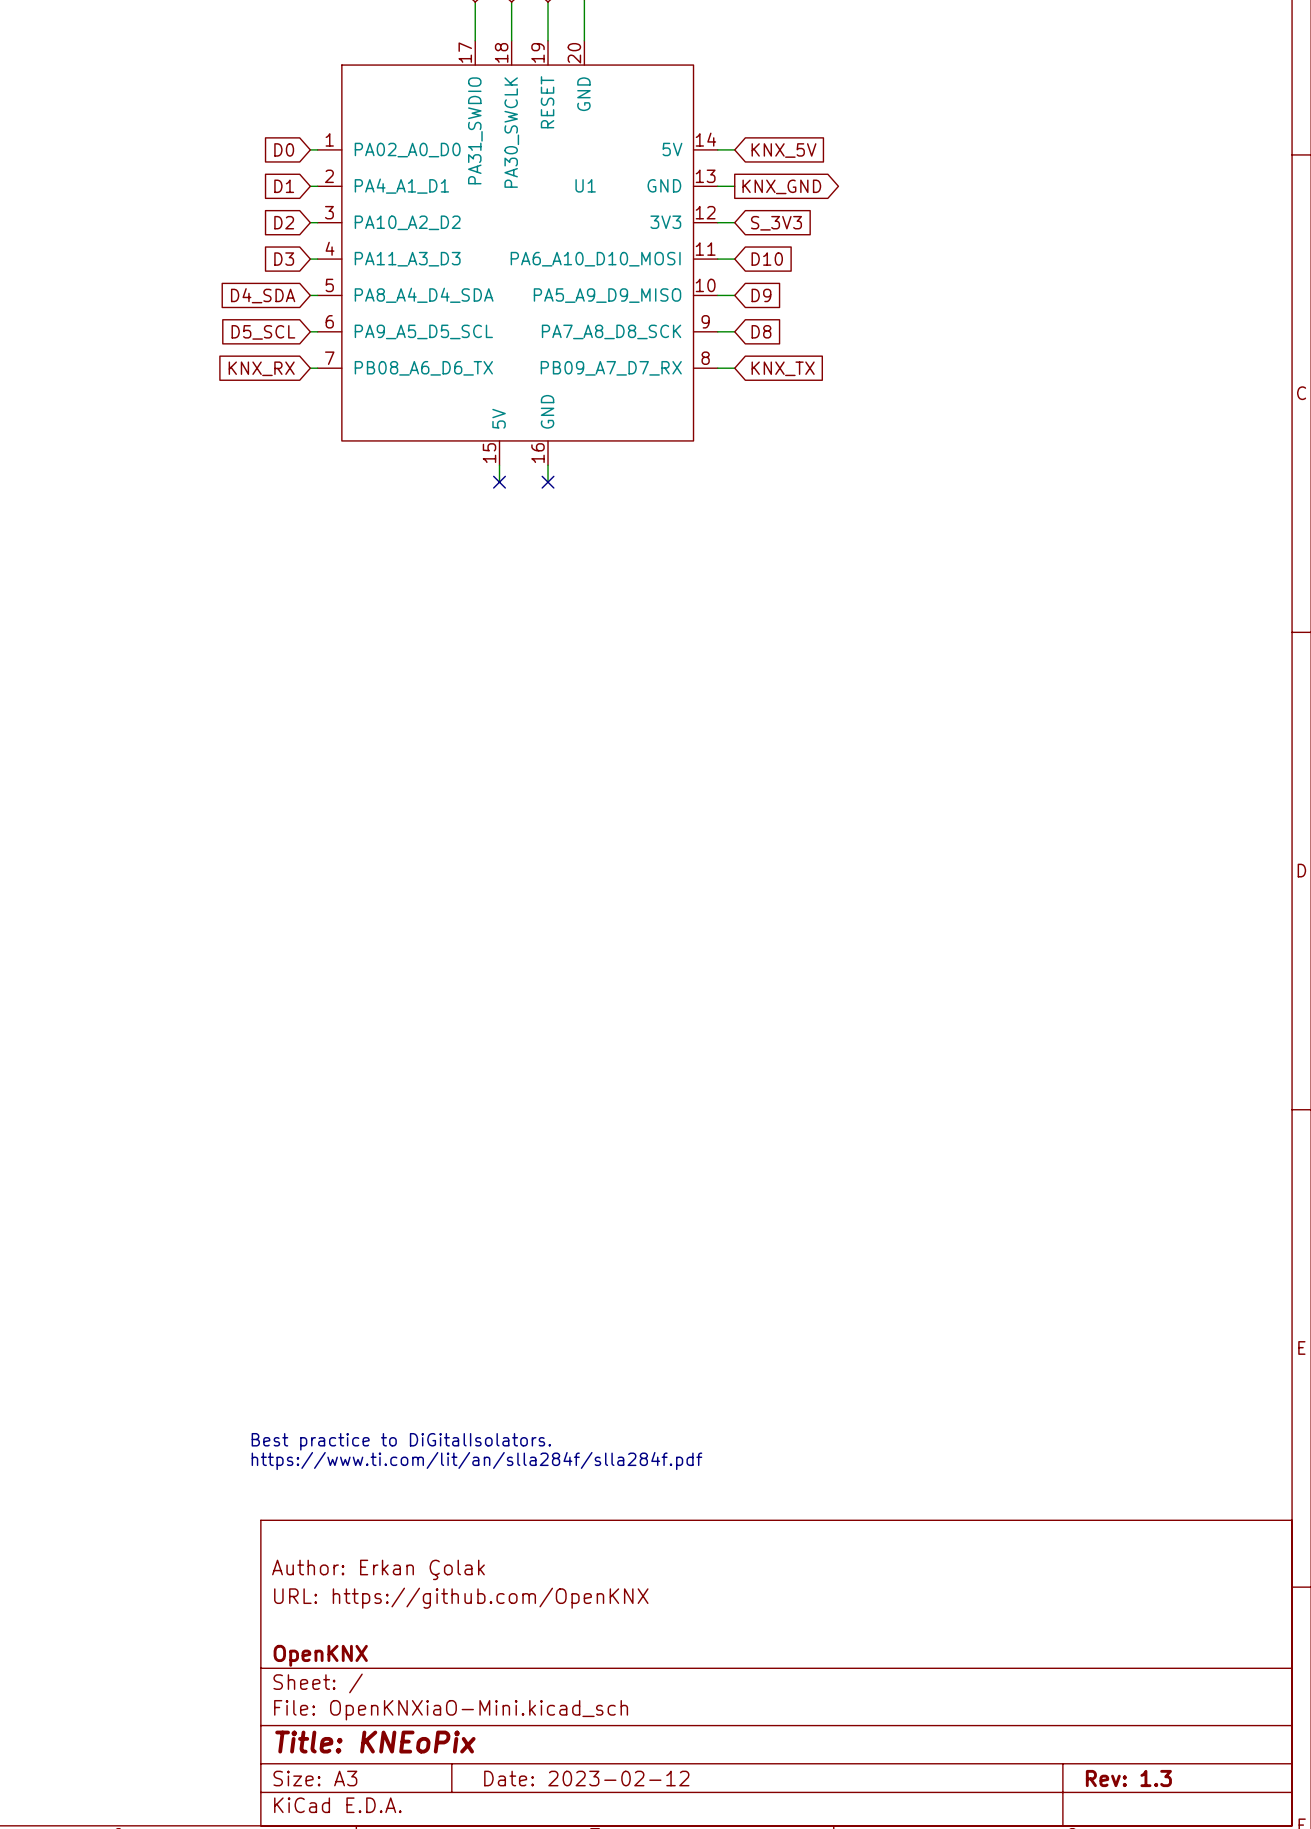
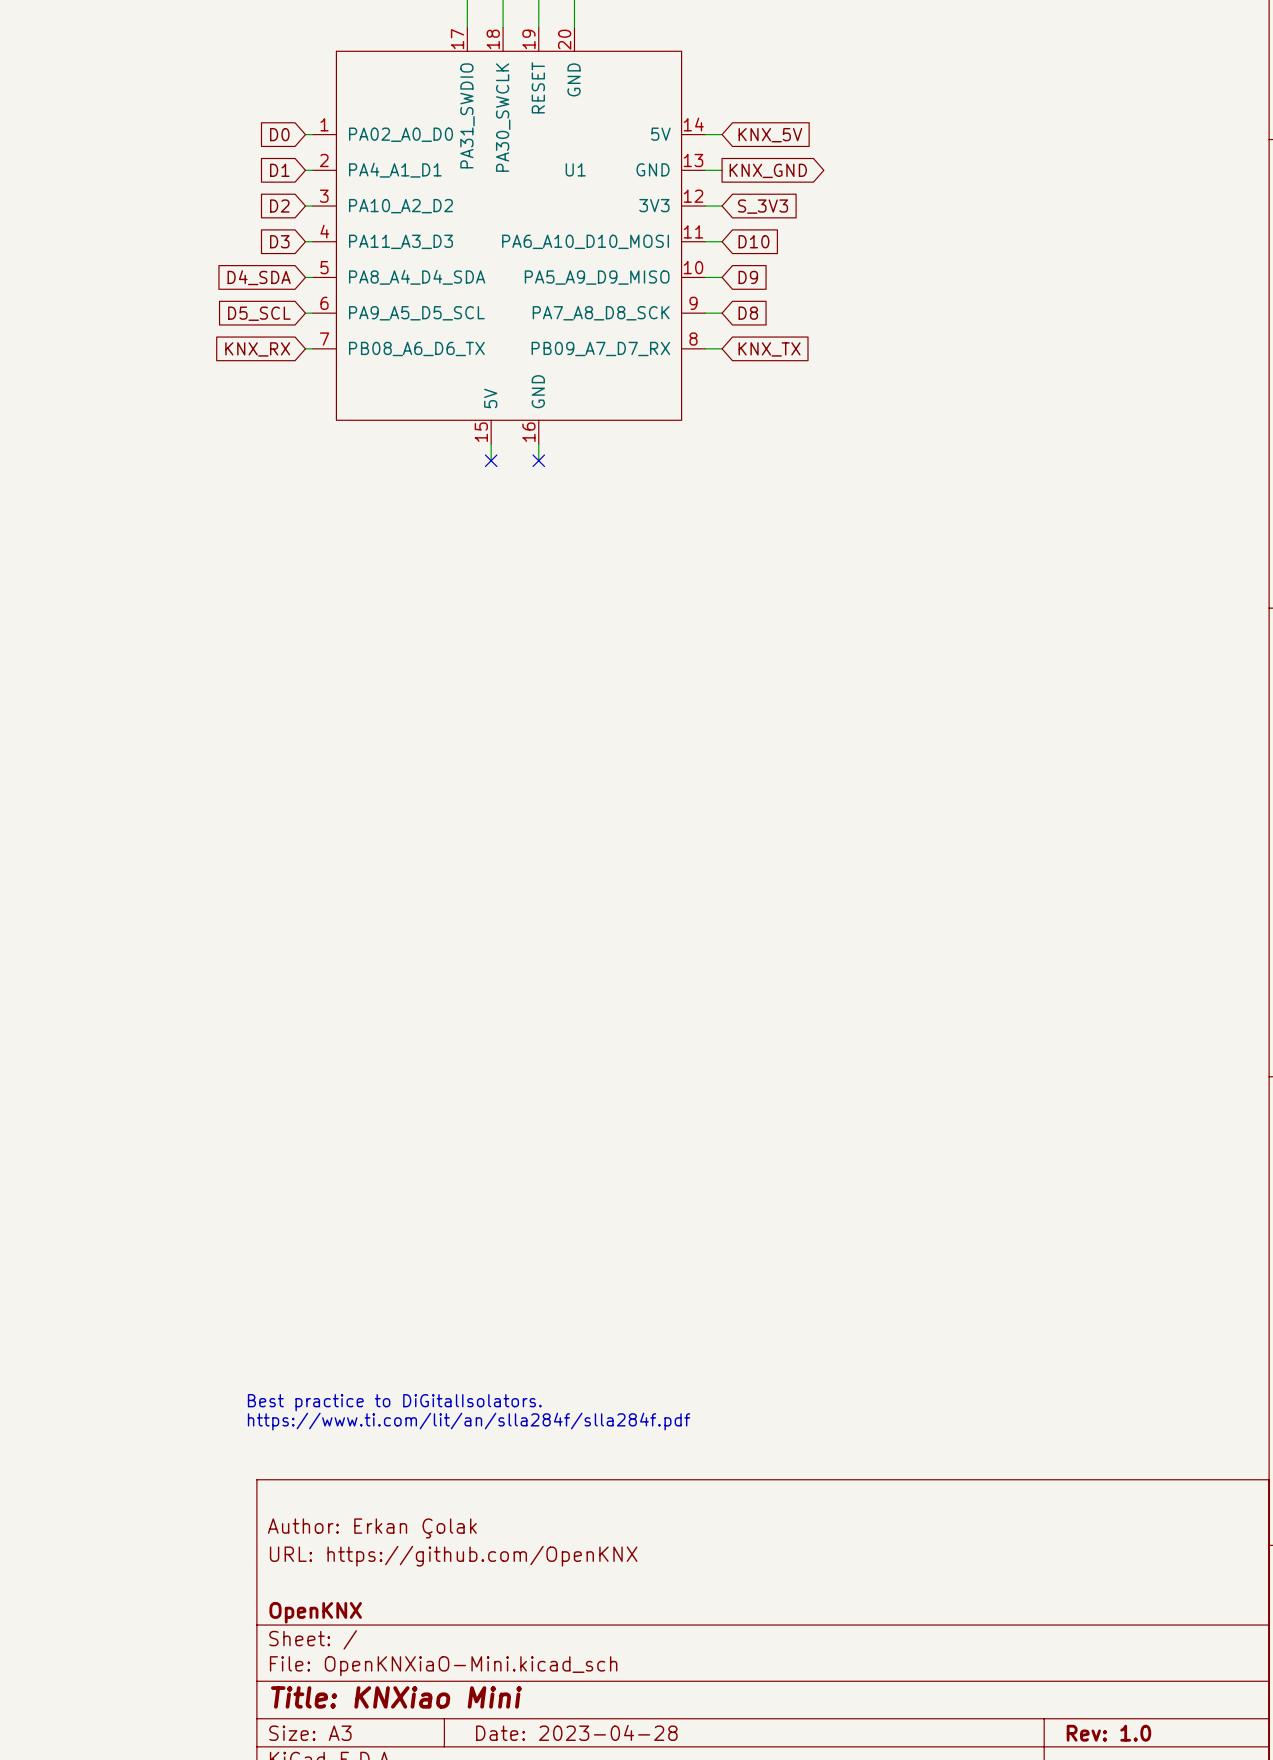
title block: Title: KNEoPix (375, 1742) -> Title: KNXiao Mini (396, 1697)
title block: Date: 2023-02-12 (586, 1778) -> Date: 2023-04-28 (576, 1732)
title block: Rev: 1.3 (1128, 1778) -> Rev: 1.0 (1108, 1733)

